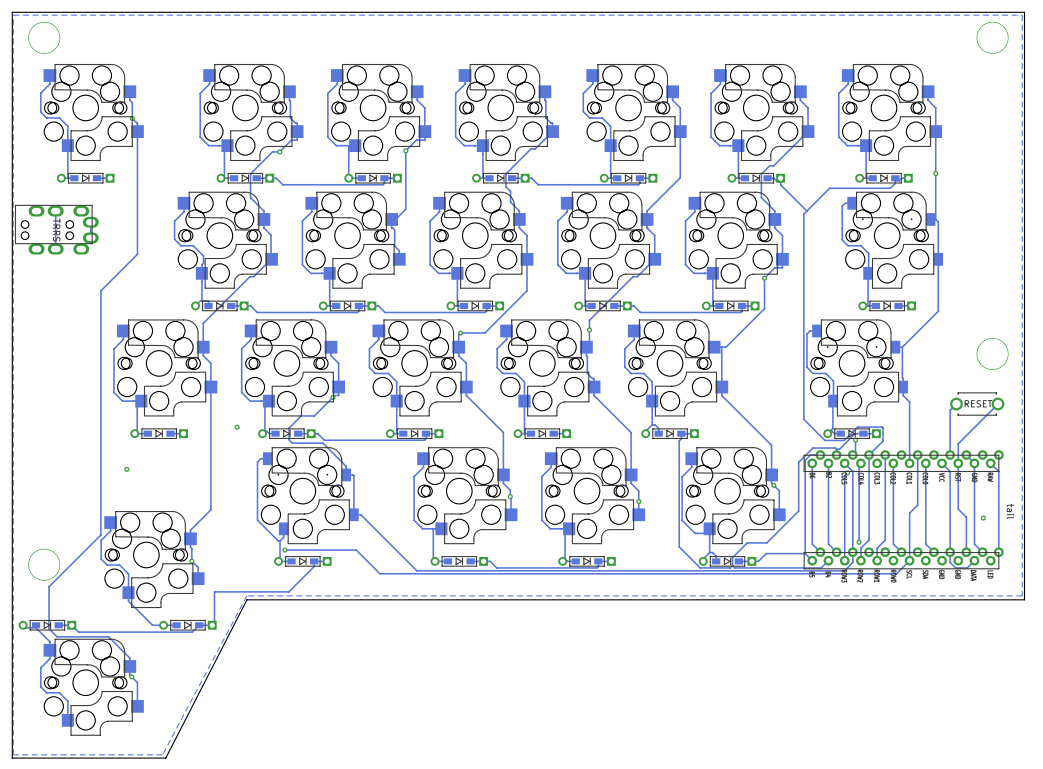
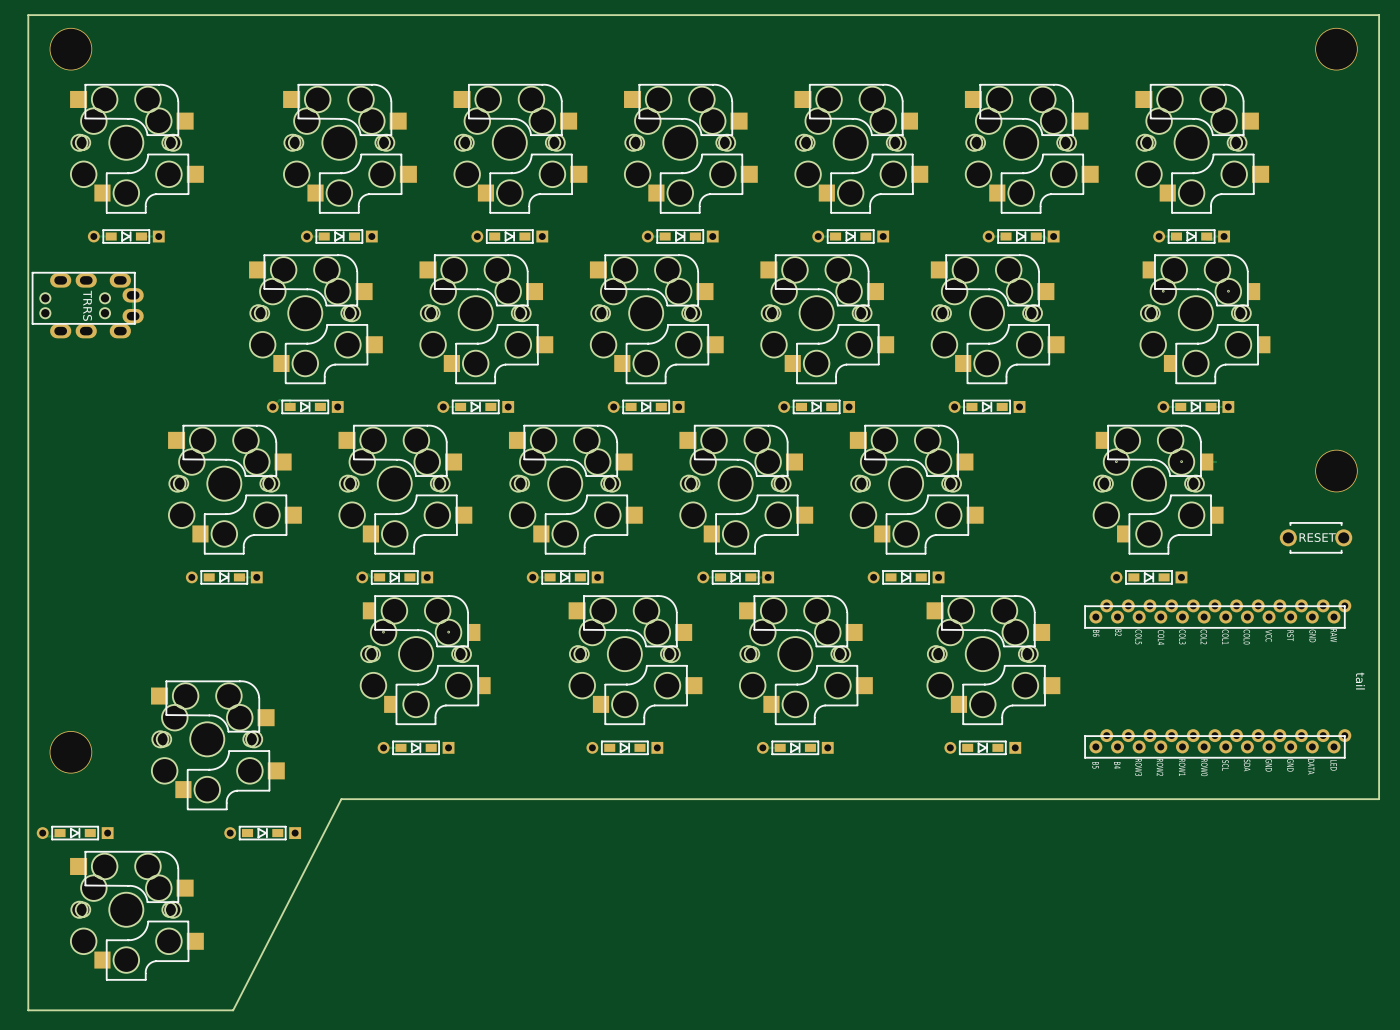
zone outline: (1022, 15) (1022, 595) (246, 595) (162, 754) (13, 754) (13, 15) (1022, 15) -> none
track: (49, 75) (49, 84) (40, 93) (40, 112) (46, 118) (59, 118) (67, 126) (67, 178) -> none
track: (209, 75) (209, 84) (200, 93) (200, 137) (208, 145) (227, 145) -> none
track: (337, 75) (337, 84) (327, 93) (327, 137) (336, 145) (355, 145) -> none
track: (465, 75) (465, 84) (455, 93) (455, 137) (464, 145) (482, 145) (482, 178) -> none
track: (592, 75) (592, 84) (583, 93) (583, 111) (589, 118) (602, 118) (610, 126) (610, 178) -> none
track: (720, 75) (720, 84) (711, 93) (711, 137) (719, 145) (738, 145) (738, 178) -> none
track: (848, 75) (848, 84) (838, 93) (838, 137) (847, 145) (866, 145) (866, 178) -> none
track: (129, 91) (132, 118) (137, 123) (137, 254) (100, 290) (100, 534) (49, 586) (49, 628) (57, 636) (108, 636) (129, 658) (129, 674) (137, 682) (137, 706) -> none
track: (289, 91) (290, 118) (297, 123) (297, 140) (291, 140) (279, 151) (272, 151) (250, 173) (250, 197) (263, 211) (263, 227) (271, 235) (271, 259) -> none
track: (417, 91) (417, 100) (424, 107) (424, 140) (416, 140) (405, 150) (405, 209) (391, 223) -> none
track: (544, 91) (545, 118) (552, 123) (552, 131) (535, 148) (530, 148) (505, 173) (505, 186) (510, 191) (510, 202) (519, 211) (519, 227) (527, 235) (527, 290) (484, 332) (460, 332) (458, 334) (458, 355) (466, 363) (466, 395) (503, 432) (503, 483) (510, 490) (511, 514) -> none
track: (672, 91) (672, 100) (680, 107) (680, 177) (647, 211) (647, 227) (654, 235) (654, 259) (637, 276) (633, 276) (589, 320) (589, 344) (586, 347) -> none
track: (800, 91) (800, 100) (808, 107) (808, 131) (773, 165) (769, 165) (761, 174) (761, 197) (774, 211) (774, 227) (782, 235) (782, 267) (774, 267) (764, 278) (764, 308) (726, 347) (714, 347) -> none
track: (928, 91) (928, 100) (935, 107) (935, 219) -> none
via: (132, 118) -> none
track: (224, 145) (224, 178) -> none
track: (348, 145) (348, 178) (361, 178) -> none
via: (405, 150) -> none
via: (279, 151) -> none
via: (935, 173) -> none
track: (397, 178) (384, 178) (383, 184) (282, 184) (276, 178) (256, 178) -> none
track: (652, 178) (639, 178) (638, 184) (538, 184) (531, 178) (512, 178) -> none
track: (780, 178) (780, 184) (806, 211) -> none
track: (895, 178) (895, 183) (890, 188) (829, 188) (803, 214) (803, 419) (824, 440) (844, 440) (857, 427) (882, 427) (882, 441) (869, 455) (869, 540) (860, 548) (860, 560) -> none
track: (184, 203) (184, 211) (174, 221) (174, 239) (180, 245) (193, 245) (203, 255) (201, 300) -> none
track: (311, 203) (311, 211) (302, 221) (302, 264) (310, 273) (329, 273) (329, 305) -> none
track: (439, 203) (439, 211) (430, 221) (430, 264) (438, 273) (457, 273) (457, 305) -> none
track: (567, 203) (567, 211) (557, 221) (557, 264) (566, 273) (585, 273) (585, 305) -> none
track: (694, 203) (694, 211) (685, 221) (685, 264) (694, 273) (712, 273) (712, 305) -> none
track: (852, 203) (845, 203) (842, 206) (842, 239) (847, 245) (860, 245) (868, 253) (868, 305) -> none
track: (55, 211) (55, 249) -> none
track: (391, 219) (391, 227) (394, 229) (394, 246) (399, 250) (399, 259) -> none
track: (935, 219) (938, 222) (938, 311) (902, 347) (903, 395) (909, 401) (909, 463) -> none
track: (271, 259) (253, 276) (250, 276) (203, 323) (203, 355) (210, 363) (210, 509) (190, 530) (191, 561) (198, 567) (198, 578) -> none
via: (764, 278) -> none
track: (499, 305) (486, 305) (485, 312) (384, 312) (378, 305) (358, 305) (357, 312) (257, 312) (250, 305) (231, 305) -> none
track: (755, 305) (742, 305) (740, 312) (640, 312) (633, 305) (614, 305) -> none
via: (589, 329) -> none
track: (123, 330) (123, 339) (113, 348) (113, 392) (122, 401) (141, 401) -> none
track: (251, 330) (251, 339) (241, 348) (241, 392) (250, 401) (269, 401) -> none
track: (378, 330) (378, 339) (369, 348) (369, 367) (375, 373) (388, 373) (396, 381) (396, 433) -> none
track: (506, 330) (506, 339) (497, 348) (497, 367) (502, 373) (516, 373) (524, 381) (524, 433) -> none
track: (634, 330) (634, 339) (624, 348) (624, 367) (631, 373) (643, 373) (652, 381) (652, 424) -> none
track: (816, 330) (810, 330) (806, 334) (806, 367) (813, 373) (825, 373) (833, 381) (832, 428) (831, 430) -> none
via: (460, 332) -> none
track: (330, 347) (330, 355) (338, 363) (338, 395) (334, 395) (314, 415) (301, 415) (289, 428) (289, 439) (292, 443) (322, 443) (346, 466) (346, 474) (353, 475) (353, 514) (360, 514) (416, 570) (844, 570) (852, 562) (852, 471) (844, 463) -> none
track: (586, 347) (587, 373) (594, 378) (594, 395) (631, 432) (631, 483) (638, 491) (638, 514) -> none
track: (721, 347) (721, 395) (771, 445) (771, 483) (779, 490) (779, 514) -> none
via: (333, 397) -> none
track: (137, 401) (137, 431) (134, 433) (147, 433) -> none
track: (264, 401) (264, 431) (262, 433) -> none
track: (956, 404) (950, 410) (950, 455) -> none
track: (997, 404) (958, 443) (958, 509) (966, 517) (966, 552) -> none
track: (652, 424) (658, 428) (658, 433) -> none
track: (652, 424) (645, 433) -> none
via: (237, 427) -> none
track: (831, 430) (834, 433) (840, 433) -> none
track: (438, 433) (425, 433) (424, 440) (324, 440) (317, 433) (298, 433) -> none
track: (694, 433) (681, 433) (679, 440) (679, 546) (700, 567) (730, 567) (732, 565) -> none
track: (876, 433) (855, 433) (839, 449) (836, 449) -> none
track: (855, 440) (855, 452) (852, 455) -> none
via: (855, 440) -> none
track: (836, 449) (812, 448) (798, 462) (798, 511) (766, 542) (747, 542) (732, 557) (732, 565) -> none
track: (820, 455) (810, 455) (805, 460) (805, 553) -> none
track: (885, 455) (885, 540) (877, 548) (877, 560) -> none
track: (917, 455) (917, 505) (909, 513) (909, 560) (896, 573) (380, 573) (356, 550) (284, 550) -> none
track: (966, 455) (974, 463) (974, 544) (982, 552) -> none
track: (267, 458) (260, 458) (257, 462) (257, 520) (280, 540) -> none
track: (423, 458) (423, 467) (414, 476) (414, 520) (422, 528) (441, 528) -> none
track: (551, 458) (551, 467) (541, 476) (541, 520) (550, 528) (569, 528) -> none
track: (691, 458) (691, 467) (682, 476) (682, 520) (695, 533) (709, 533) -> none
track: (812, 463) (812, 544) (820, 552) -> none
track: (828, 463) (828, 544) (836, 552) -> none
track: (860, 463) (859, 465) (859, 542) -> none
track: (893, 463) (893, 544) (901, 552) -> none
track: (925, 463) (925, 544) (933, 552) -> none
track: (942, 463) (950, 471) (950, 562) (955, 567) (967, 567) (974, 560) -> none
track: (990, 463) (998, 471) (998, 552) -> none
via: (126, 469) -> none
track: (847, 472) (844, 475) (844, 560) -> none
via: (847, 472) -> none
via: (773, 485) -> none
via: (510, 496) -> none
via: (638, 501) -> none
via: (983, 518) -> none
track: (110, 522) (110, 531) (101, 540) (101, 559) (107, 565) (119, 565) (128, 573) (128, 601) (152, 625) (176, 625) -> none
track: (283, 528) (283, 537) (280, 540) -> none
track: (433, 528) (433, 559) (447, 561) -> none
track: (565, 528) (565, 559) (562, 561) -> none
track: (709, 528) (709, 552) -> none
track: (280, 540) (280, 561) -> none
via: (859, 542) -> none
via: (284, 550) -> none
track: (709, 552) (703, 561) -> none
track: (709, 552) (716, 556) (716, 561) -> none
track: (805, 553) (766, 553) (758, 561) (738, 561) -> none
track: (805, 553) (812, 560) -> none
track: (828, 560) (821, 567) (734, 567) (732, 565) -> none
via: (191, 561) -> none
track: (327, 561) (314, 561) (314, 566) (288, 591) (214, 591) (214, 623) (212, 625) (199, 625) (192, 632) (78, 632) (71, 625) (58, 625) -> none
track: (611, 561) (598, 561) (596, 567) (496, 567) (490, 561) (470, 561) -> none
track: (36, 625) (36, 627) (49, 641) (49, 658) (40, 667) (40, 686) (46, 692) (59, 692) (67, 701) (67, 720) -> none
via: (131, 676) -> none

